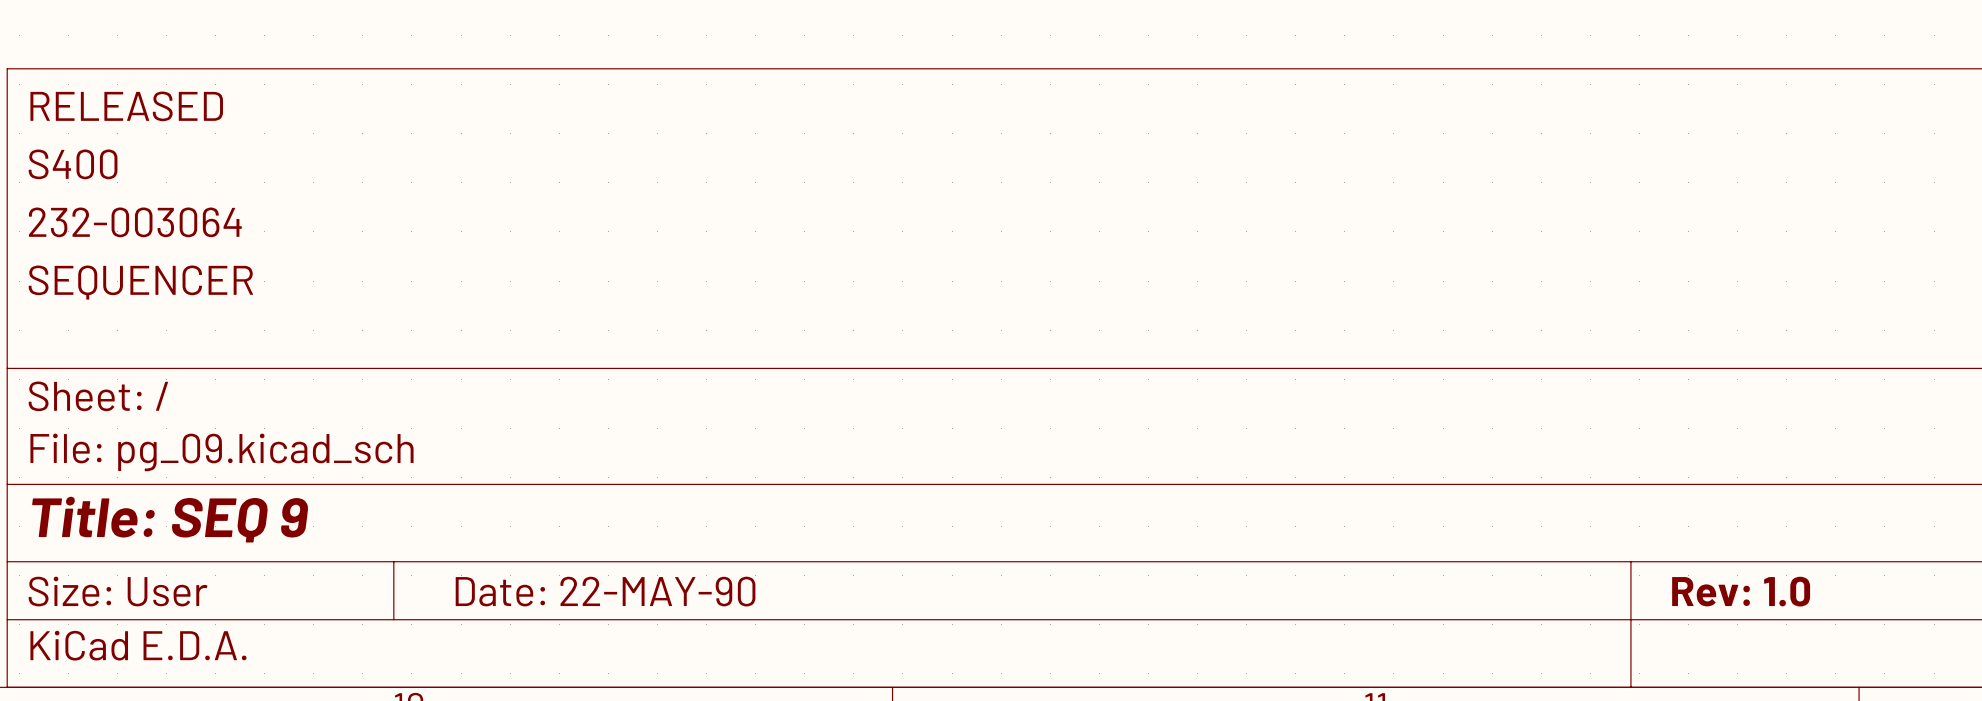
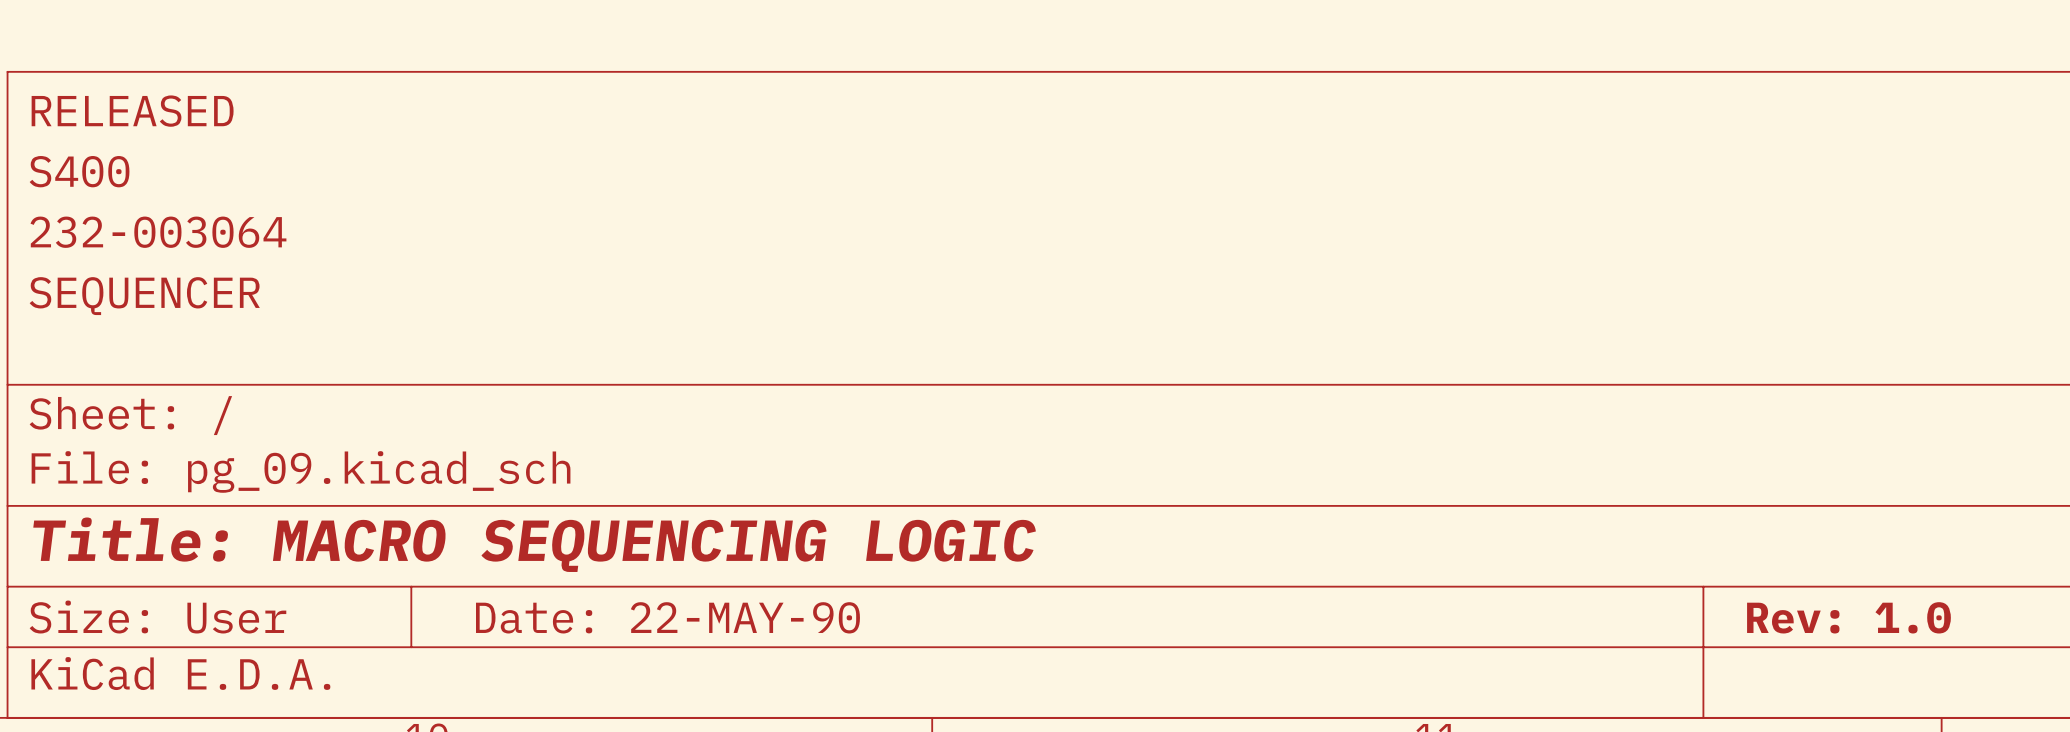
title block: Title: SEQ 9 (170, 519) -> Title: MACRO SEQUENCING LOGIC (534, 544)

